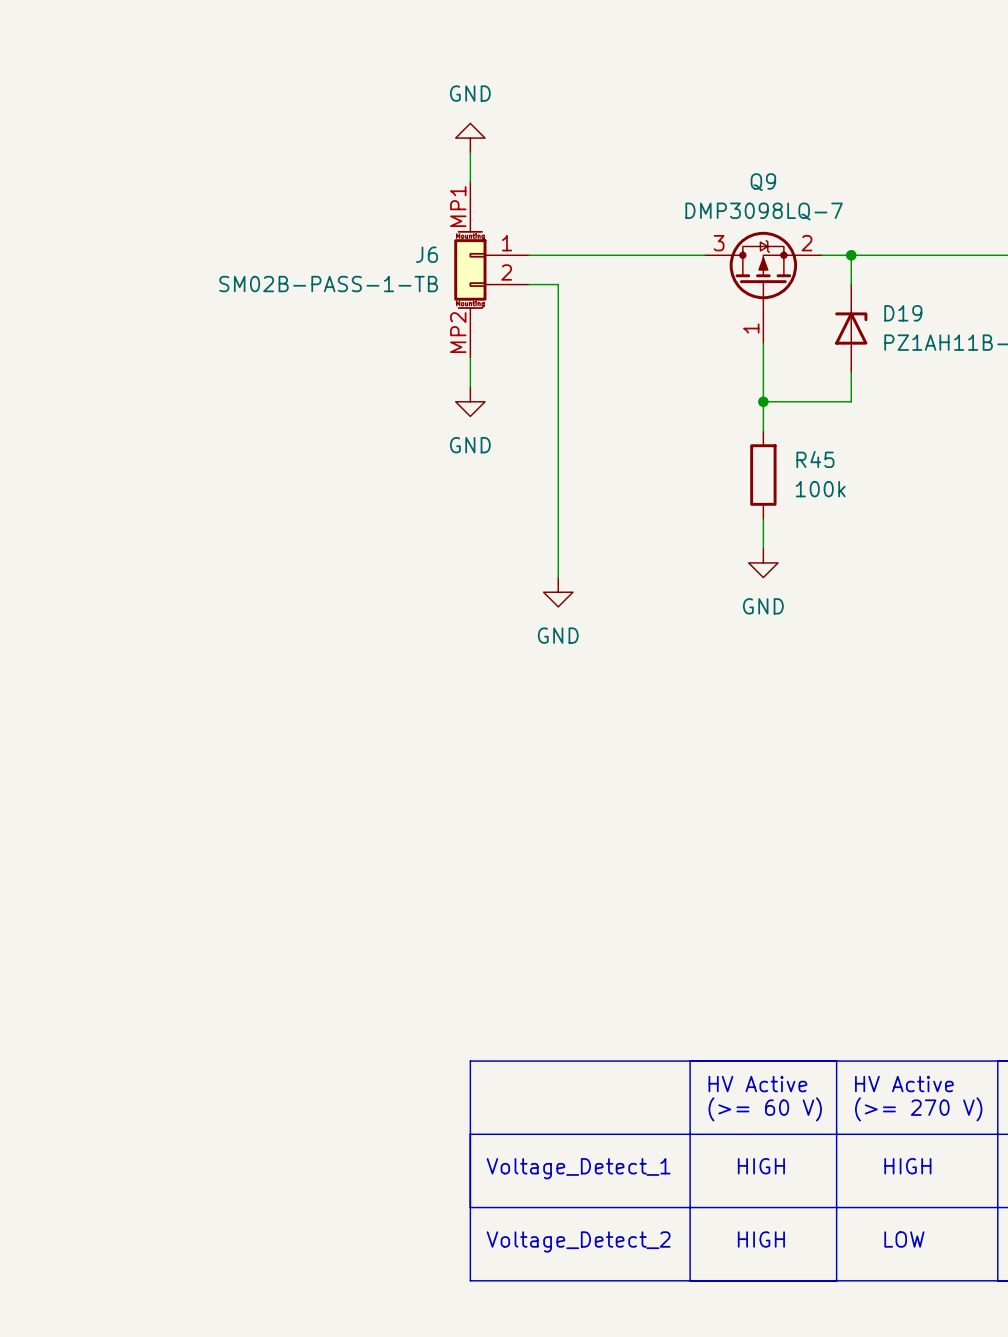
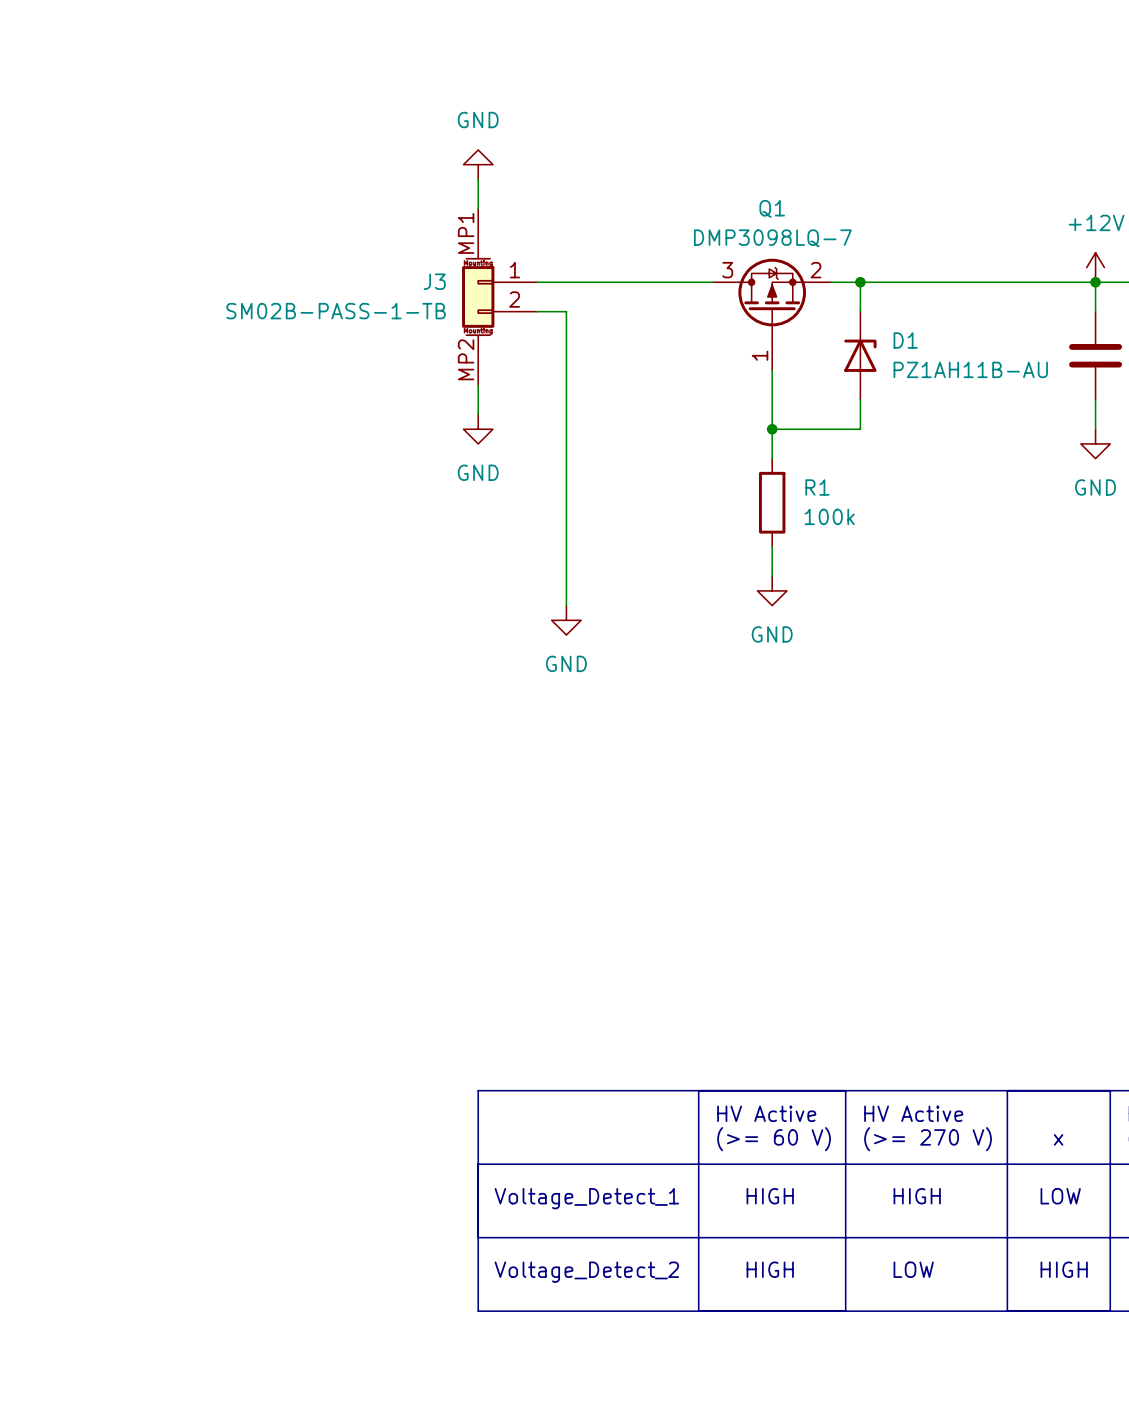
Q9 name: Q9 (763, 182) -> Q1 (772, 208)
J6 name: J6 (427, 254) -> J3 (434, 281)
D19 name: D19 (903, 313) -> D1 (905, 340)
R45 name: R45 (815, 459) -> R1 (817, 487)

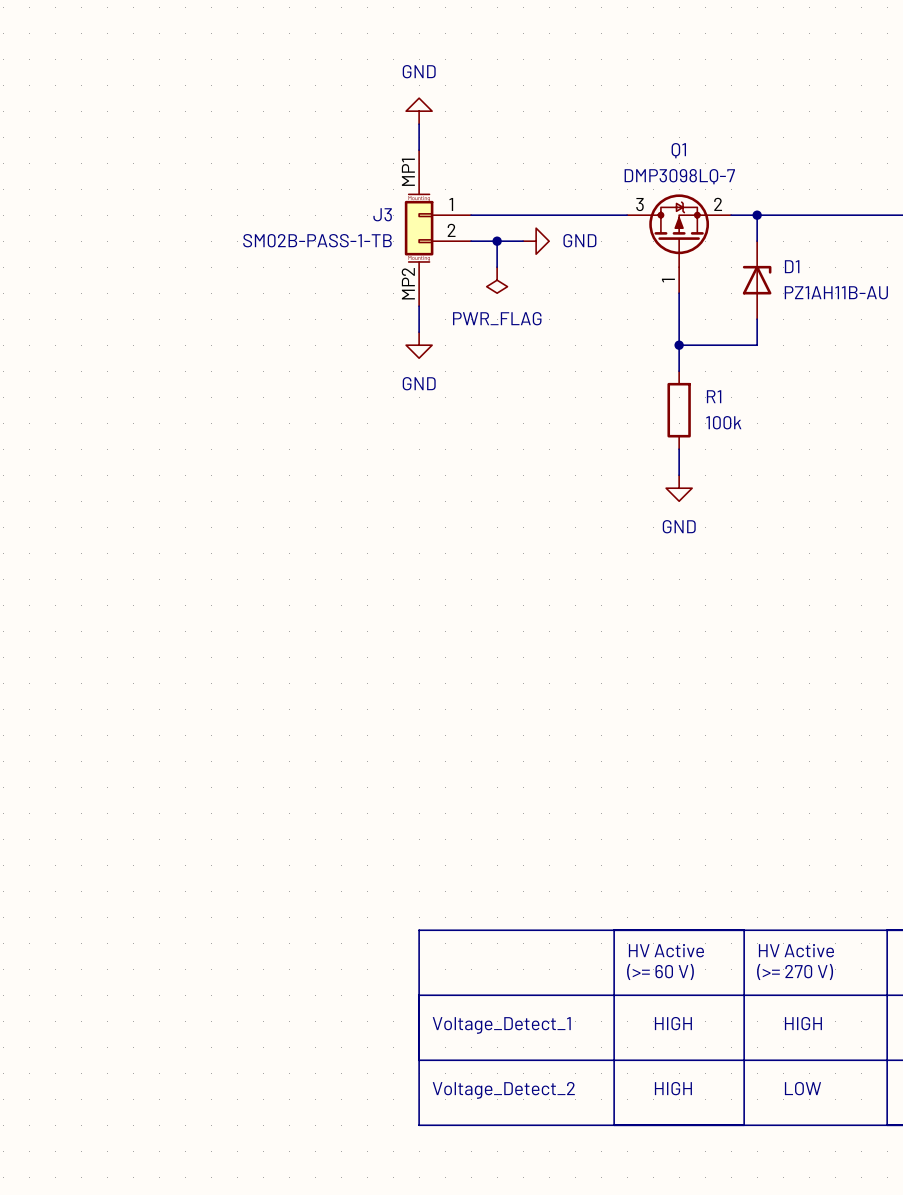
wire: none -> (497, 241) (523, 241)
junction: none -> (497, 241)
power symbol: none -> GND (536, 241)
wire: (566, 341) (566, 605) -> none
power symbol: none -> PWR_FLAG (497, 280)
power symbol: GND (566, 620) -> none

